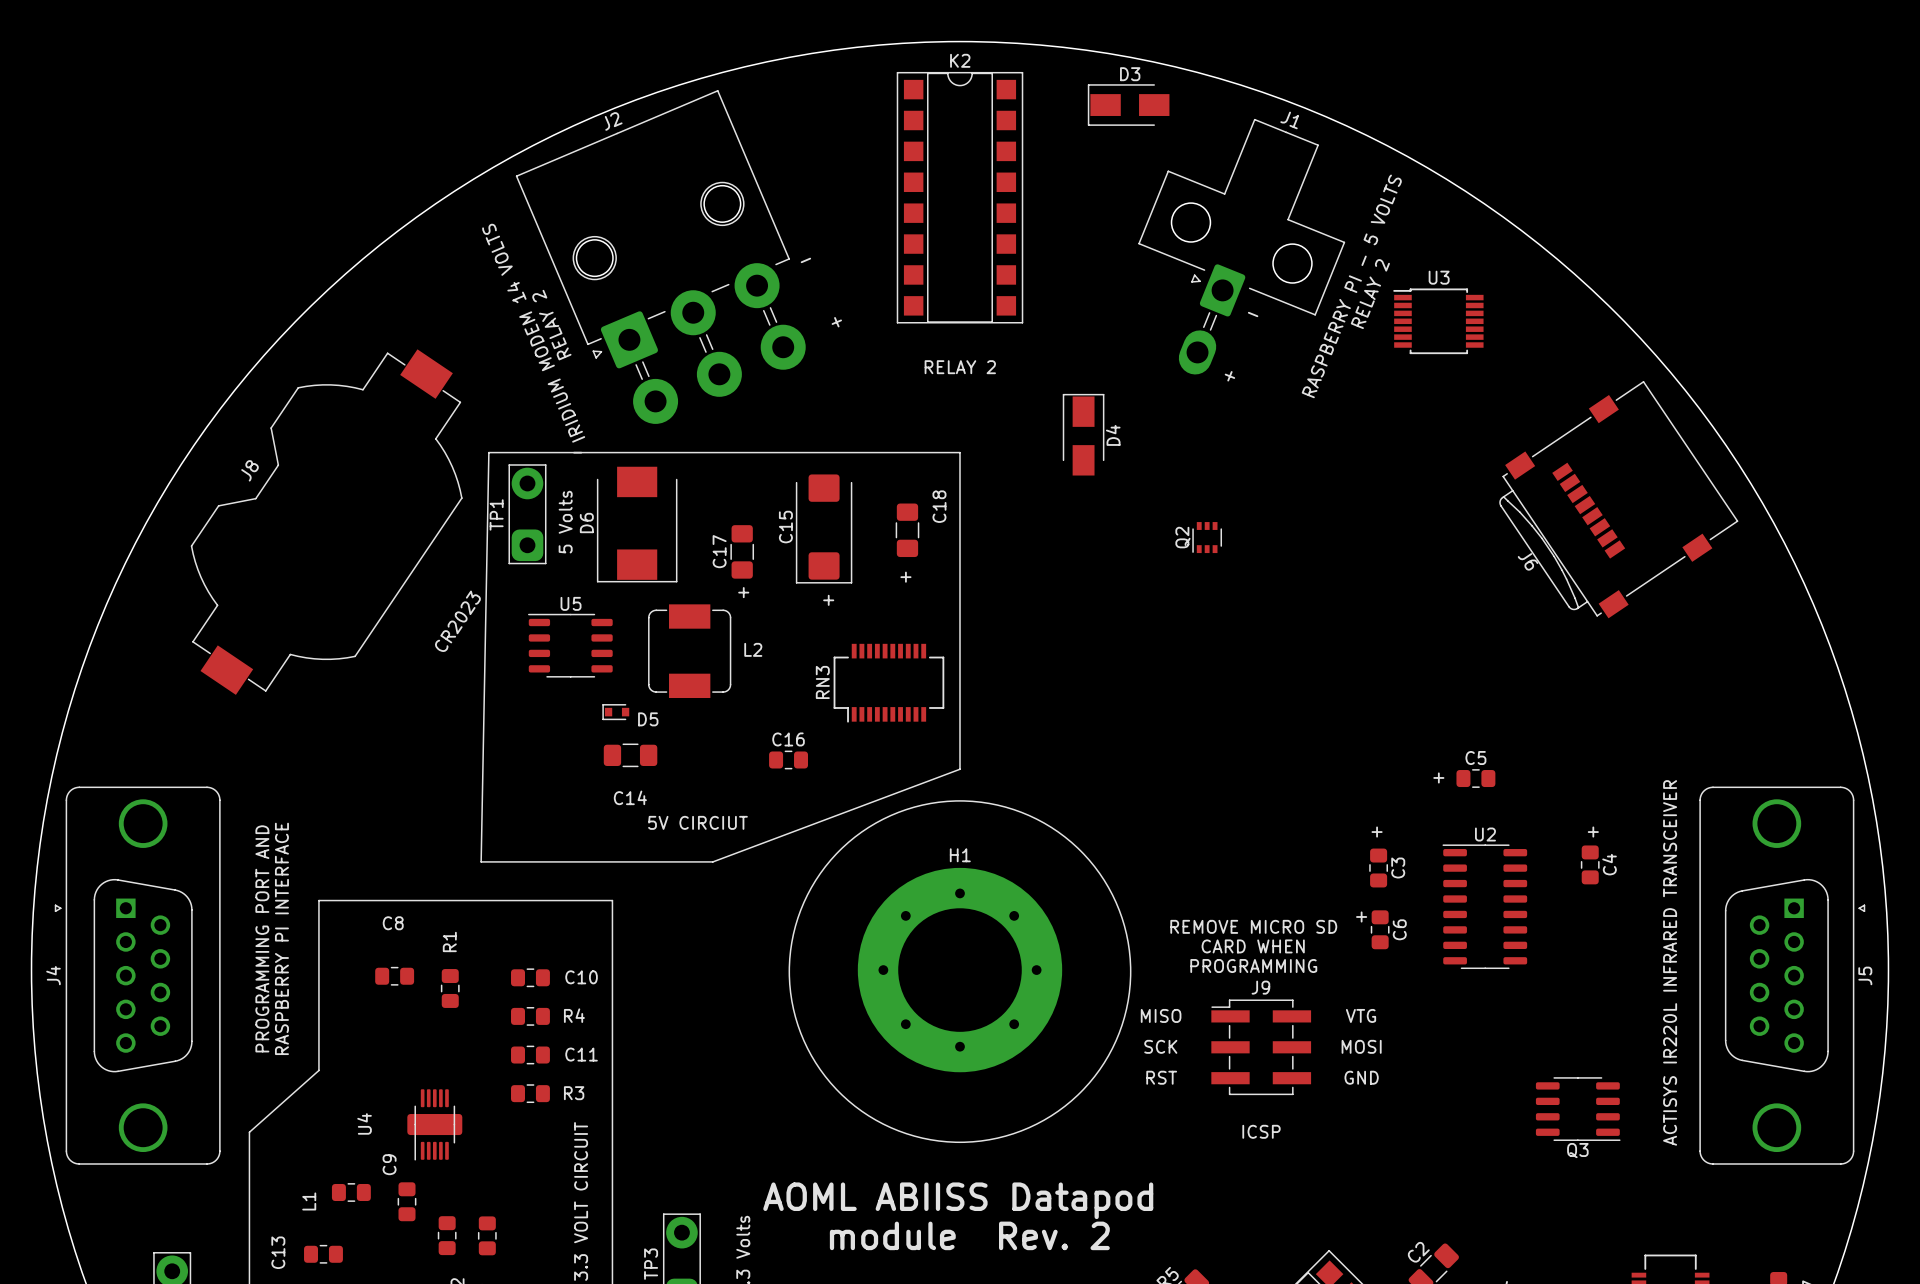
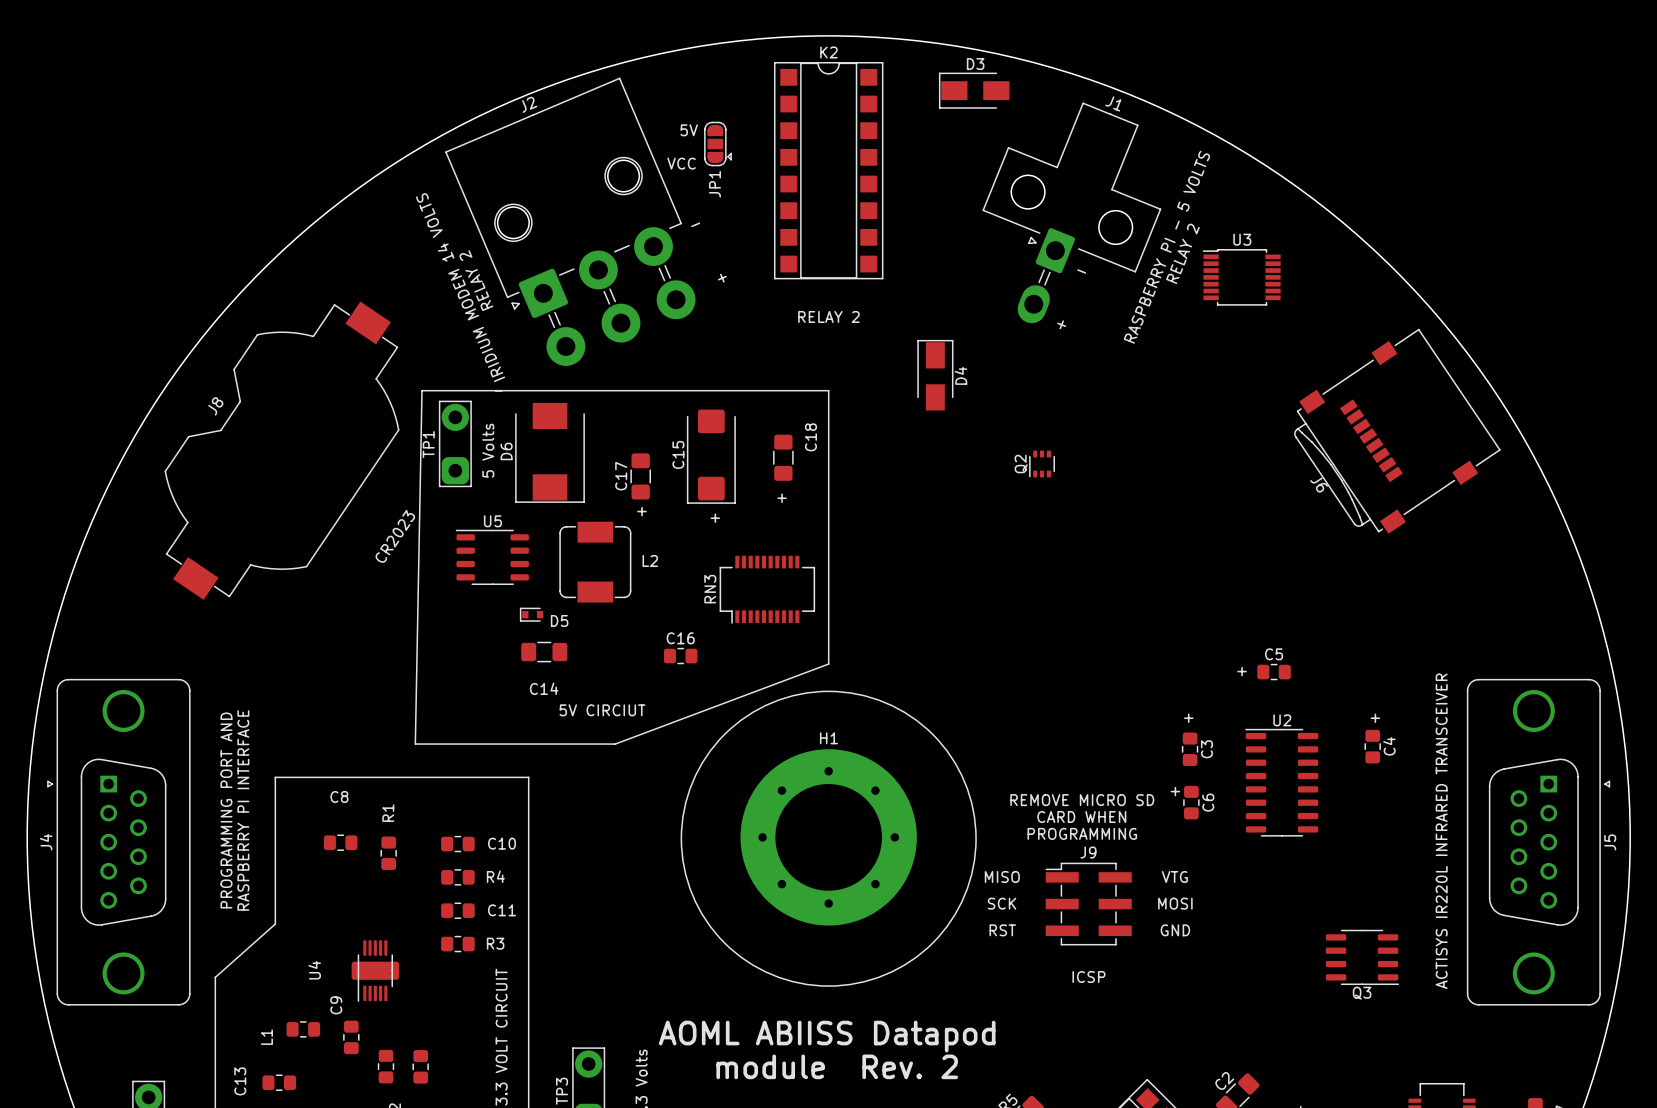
text: none -> 5V (689, 130)
JP1: none -> (717, 144)
text: none -> VCC (681, 163)

